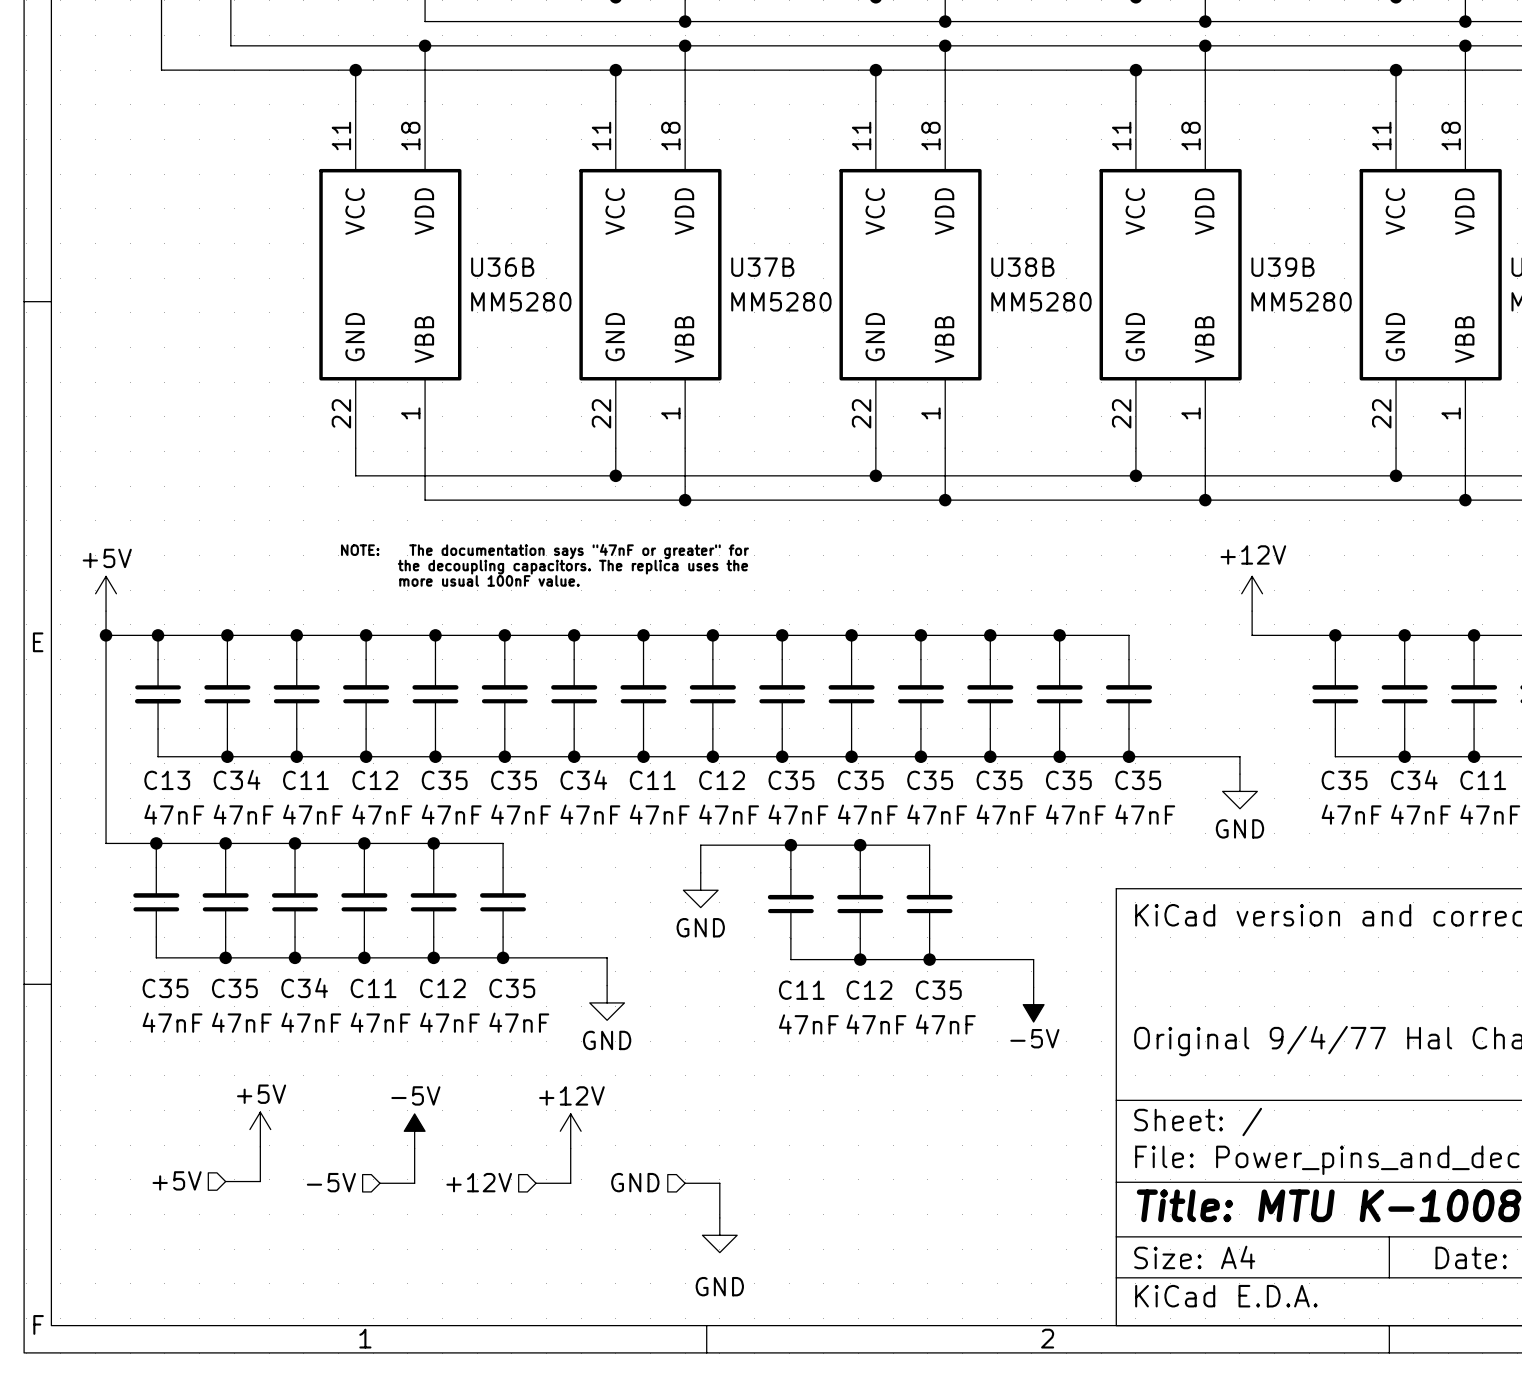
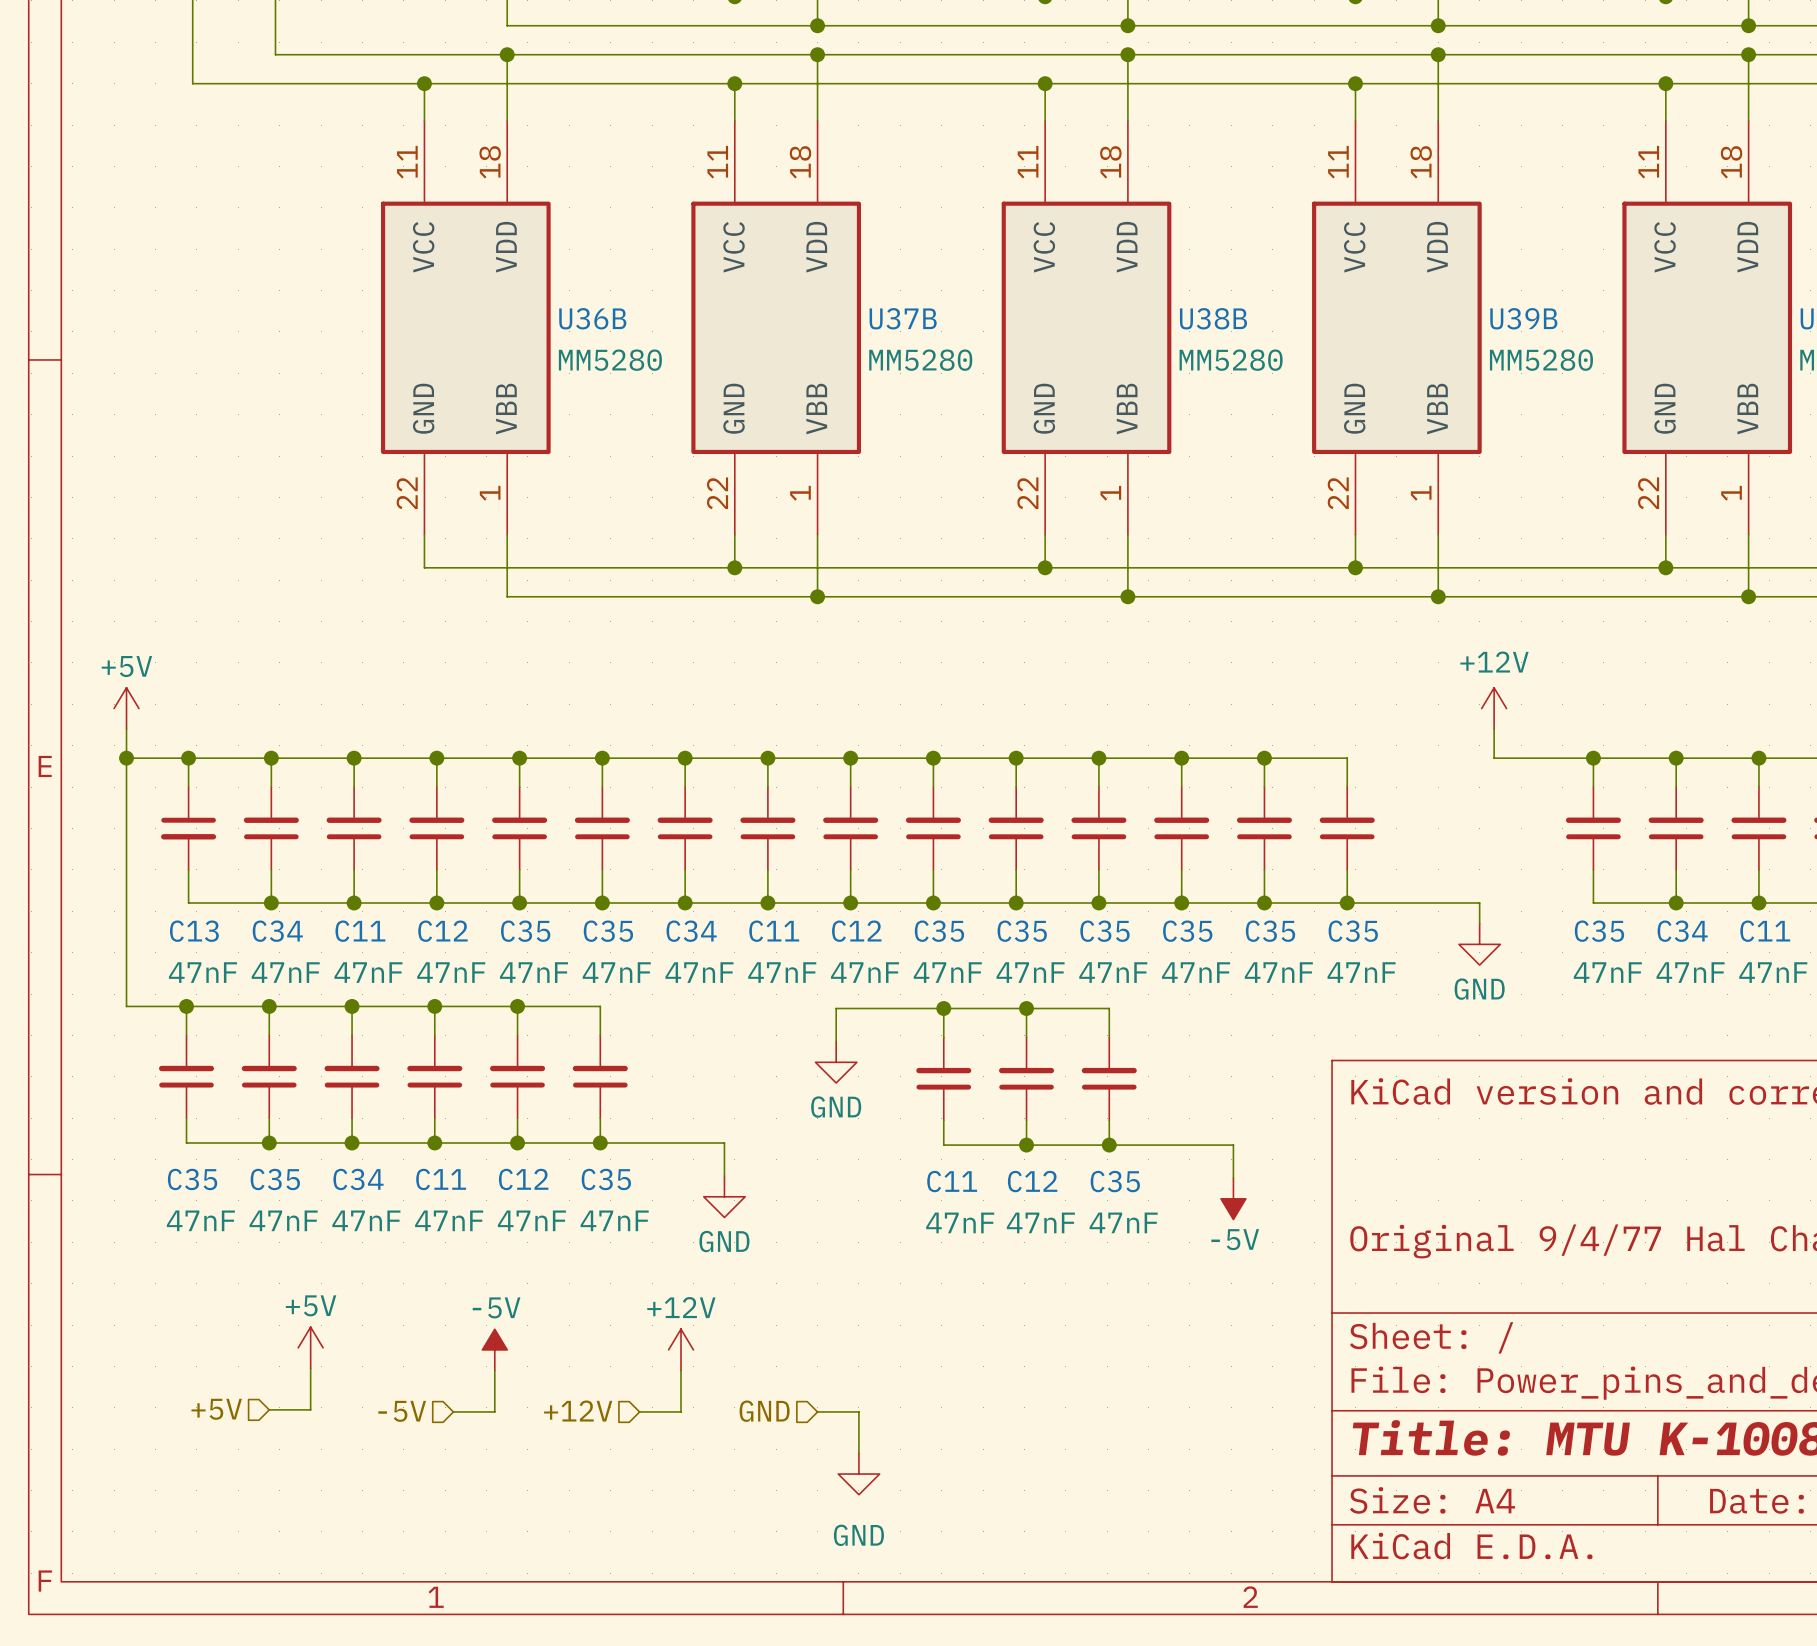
text: NOTE: The documentation says "47nF or greater" for (544, 551) -> none
text: the decoupling capacitors. The replica uses the (572, 567) -> none
text: more usual 100nF value. (489, 580) -> none

